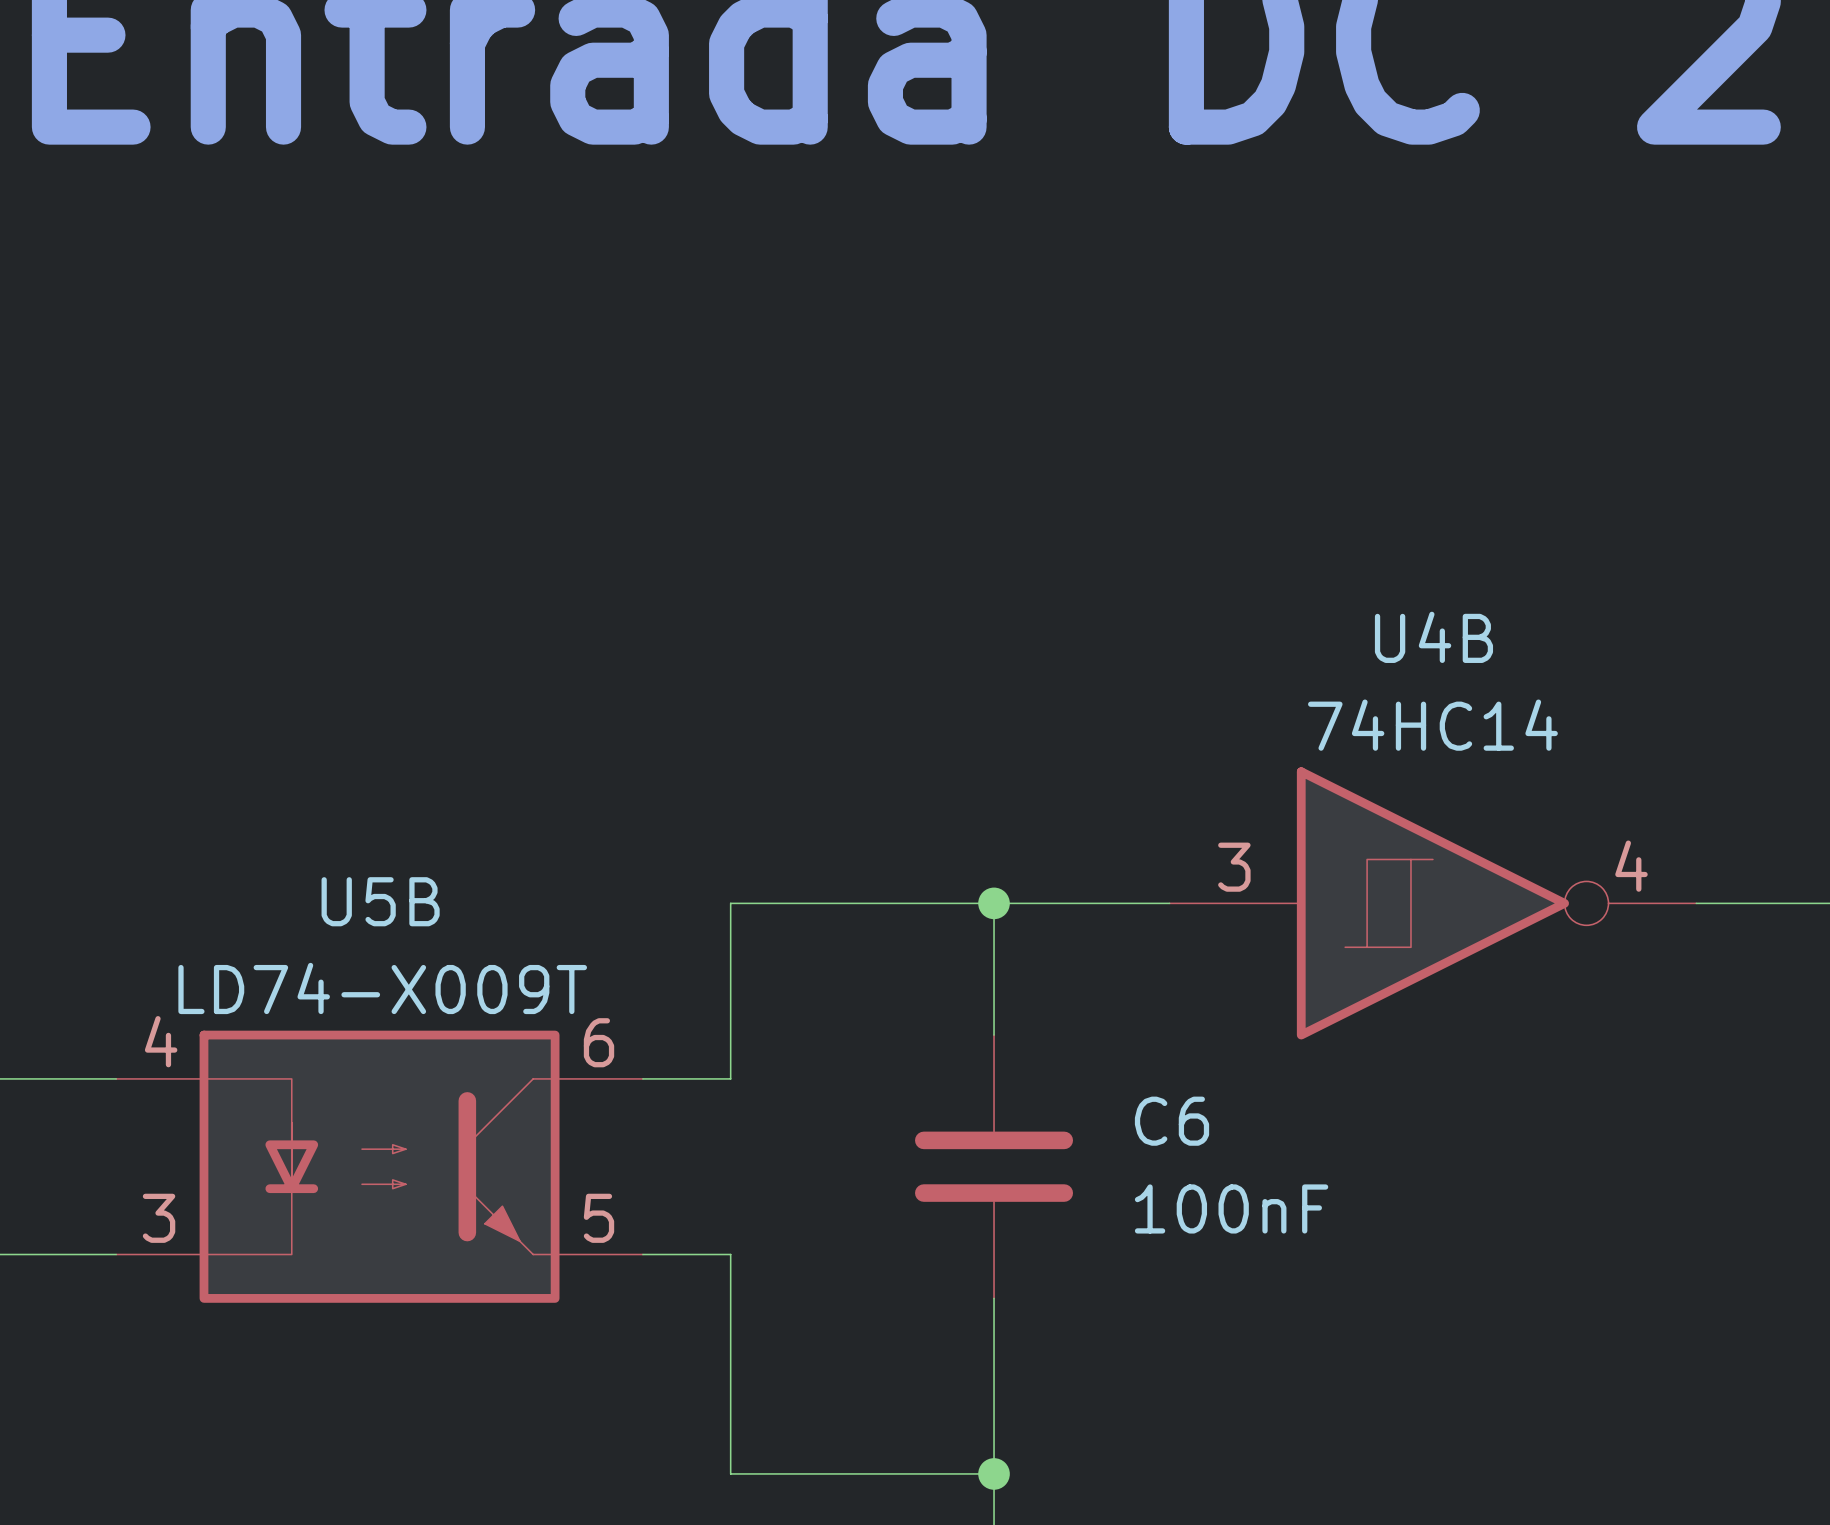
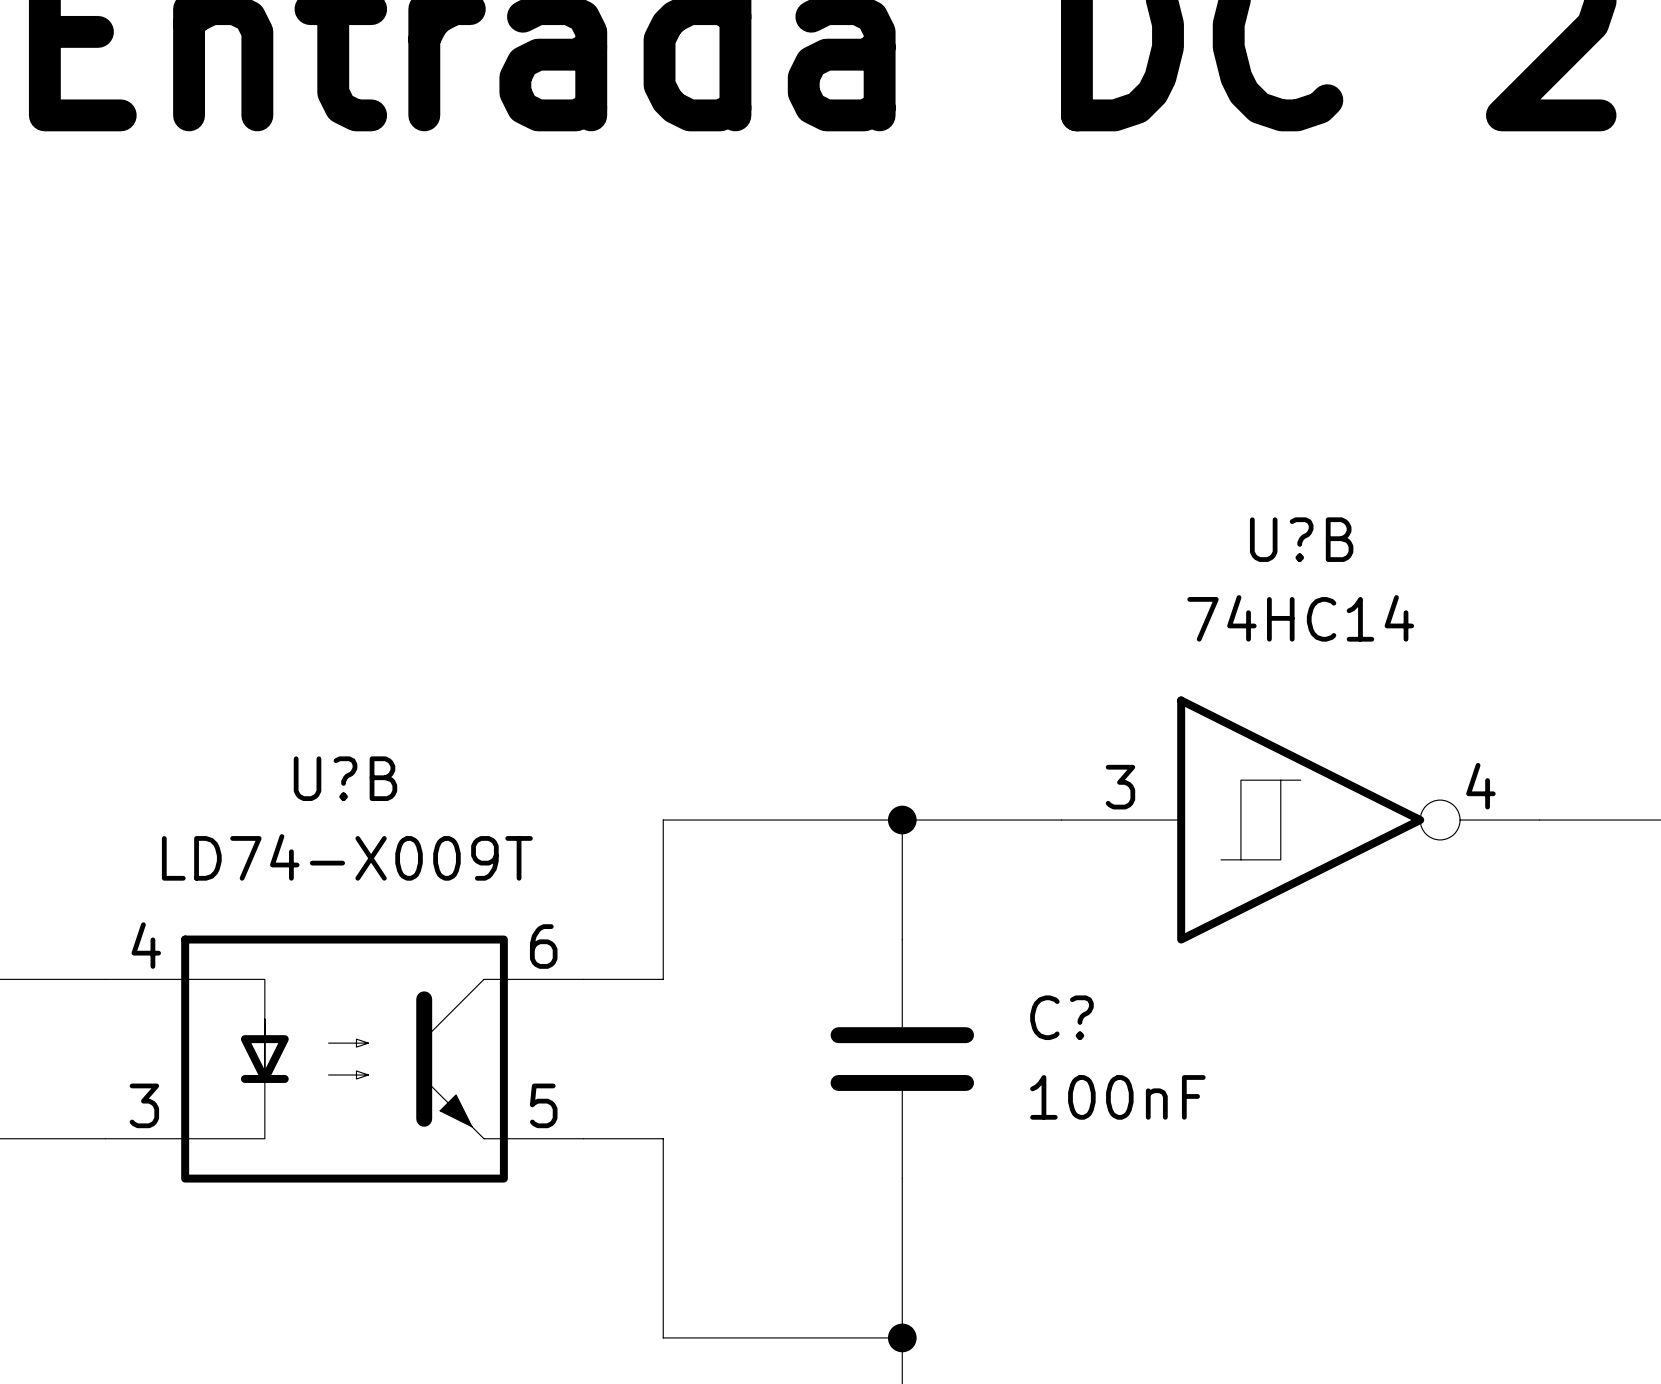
U4B name: U4B (1433, 637) -> U?B (1301, 539)
U4B value position: 74HC14 (1432, 725) -> 74HC14 (1300, 618)
U5B name: U5B (380, 901) -> U?B (345, 778)
U5B value position: LD74-X009T (382, 988) -> LD74-X009T (347, 857)
C6 name: C6 (1172, 1121) -> C? (1061, 1017)

